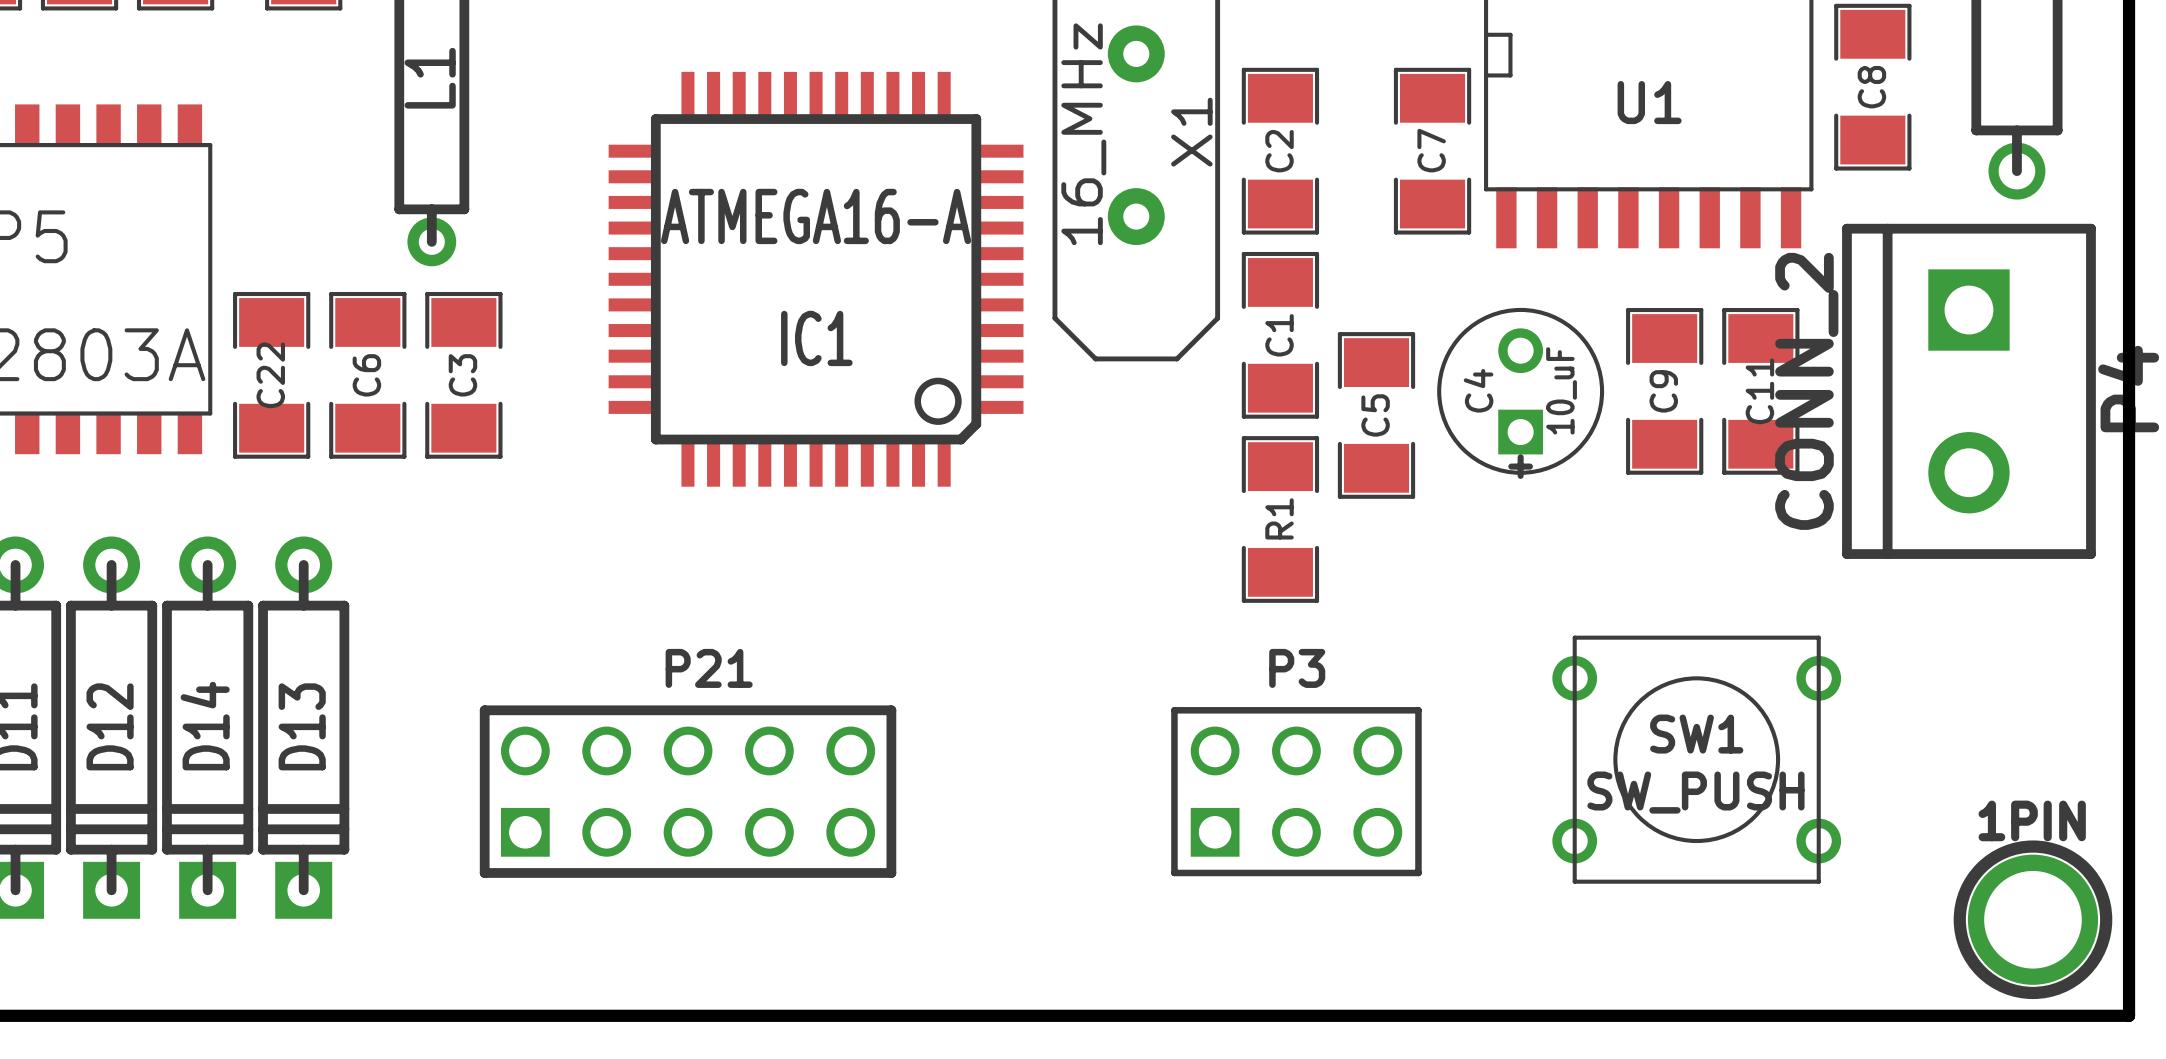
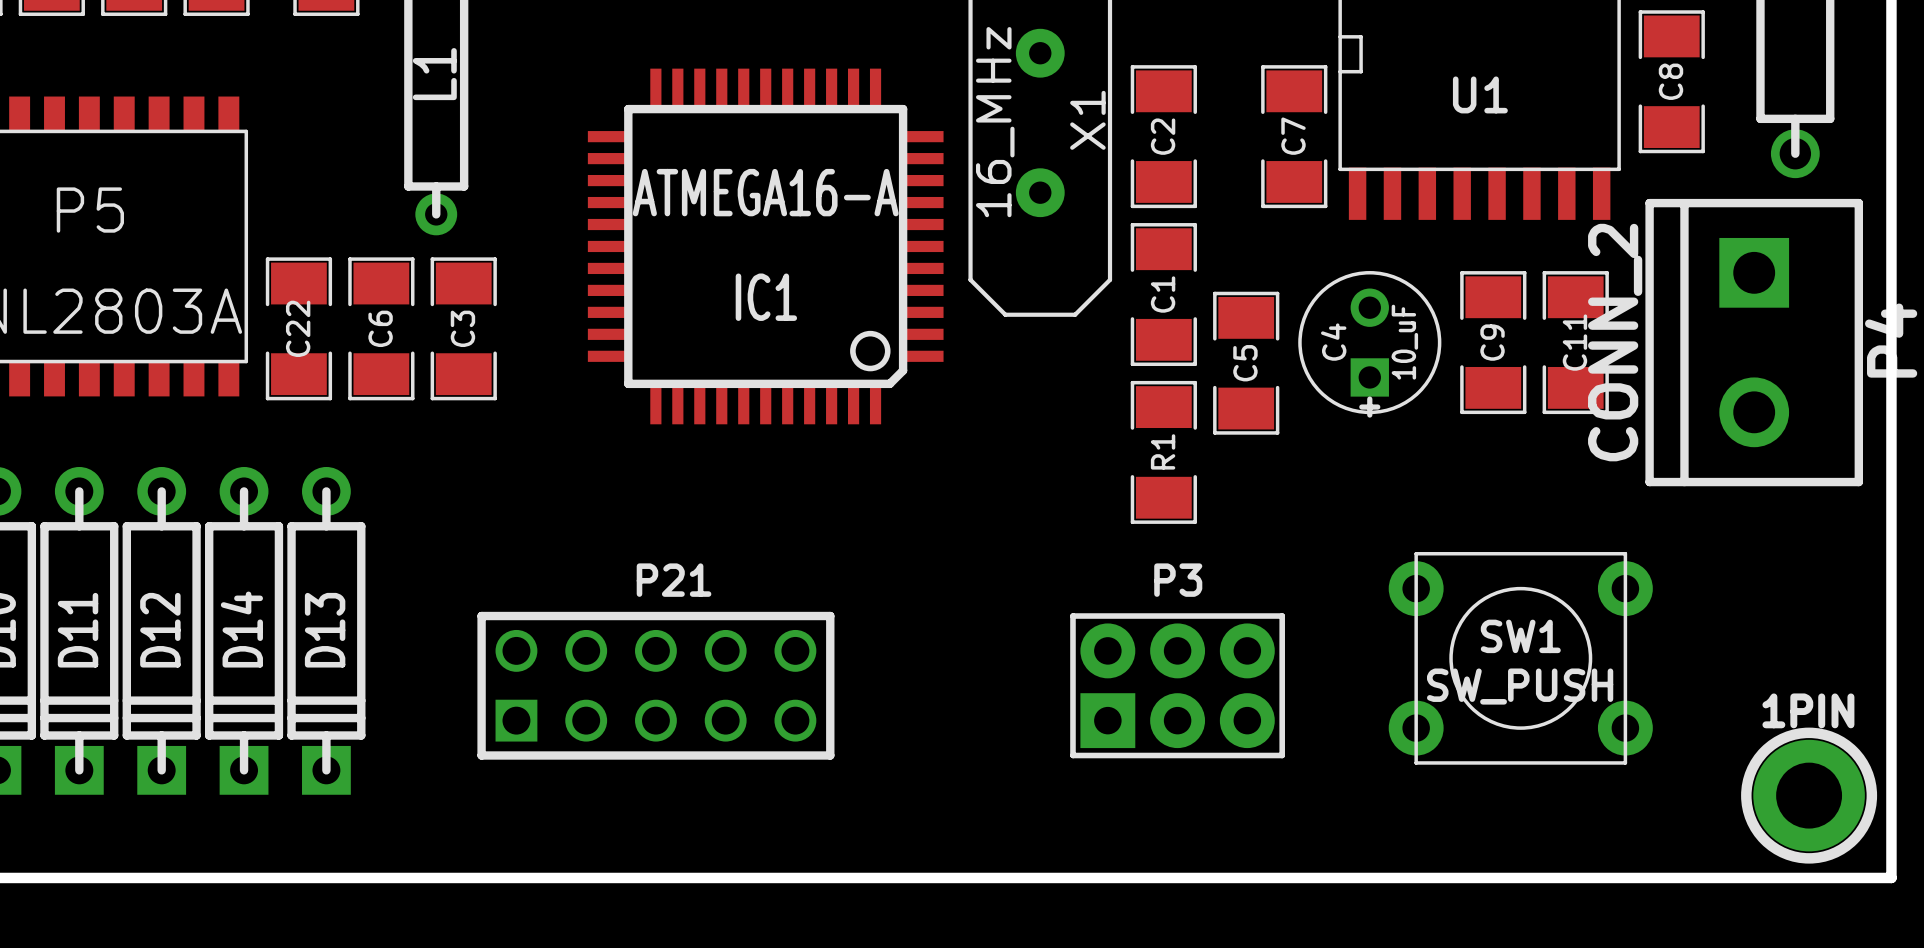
SW1 footprint: [1552, 635, 1842, 884] -> [1388, 552, 1653, 765]
P3 footprint: [1171, 707, 1422, 877] -> [1070, 613, 1285, 759]
1PIN footprint: [1953, 840, 2113, 1000] -> [1741, 727, 1878, 864]

